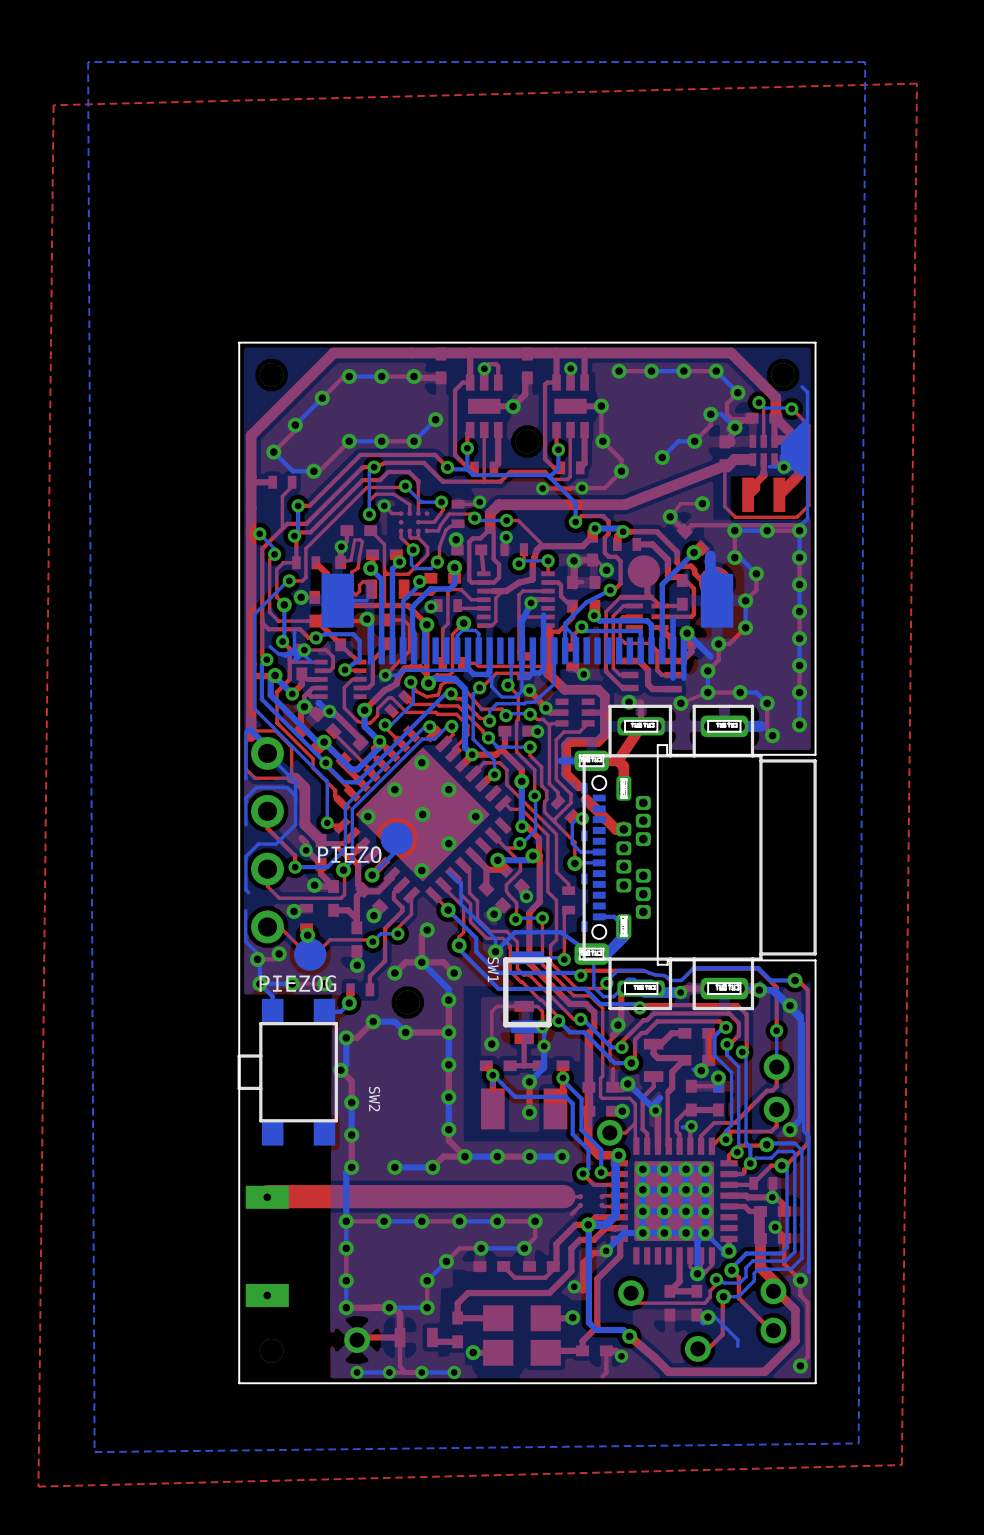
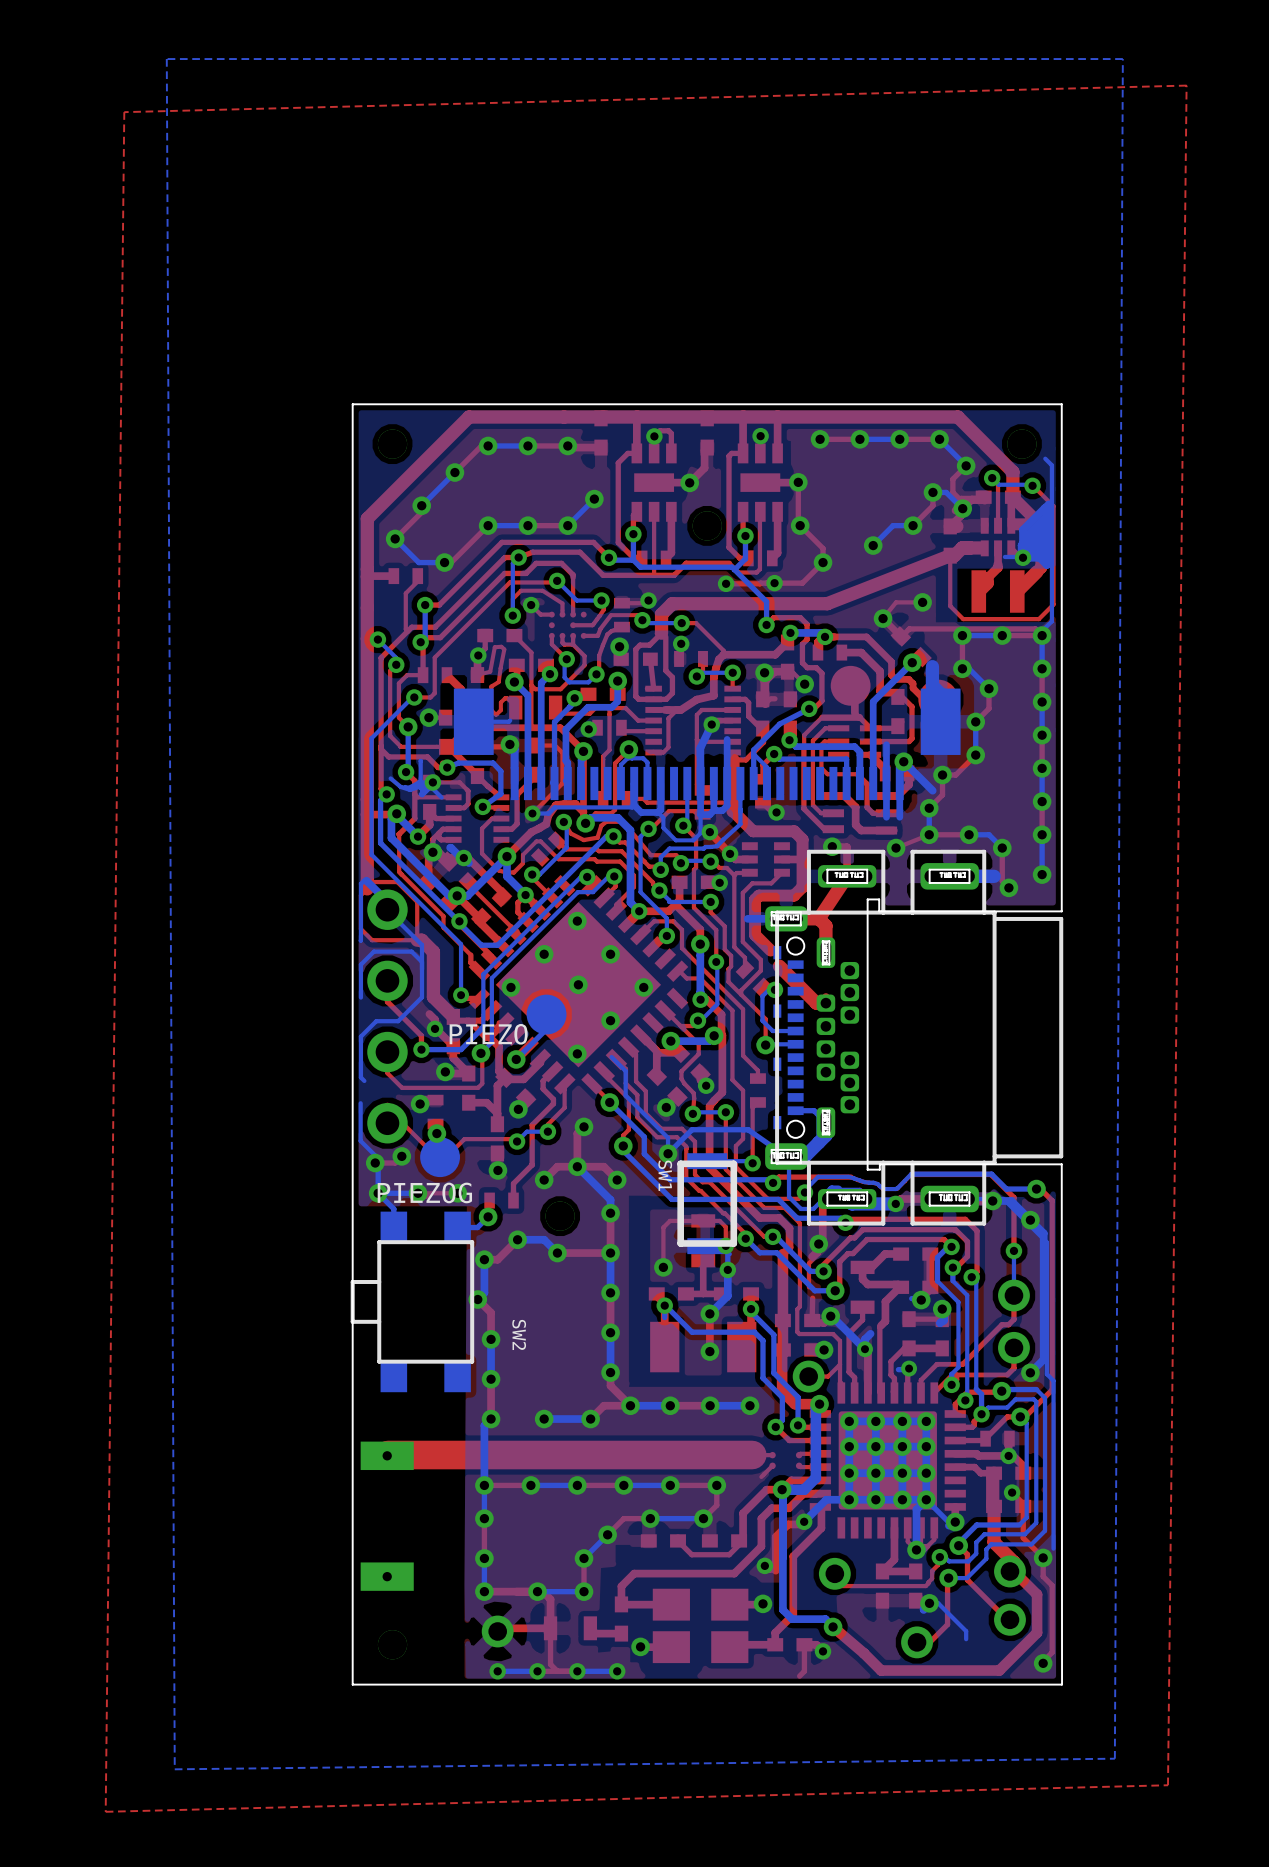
bottom track: (379, 741) (379, 747) (357, 769) (351, 769) (324, 742) -> (506, 856) (467, 895) (457, 895)

